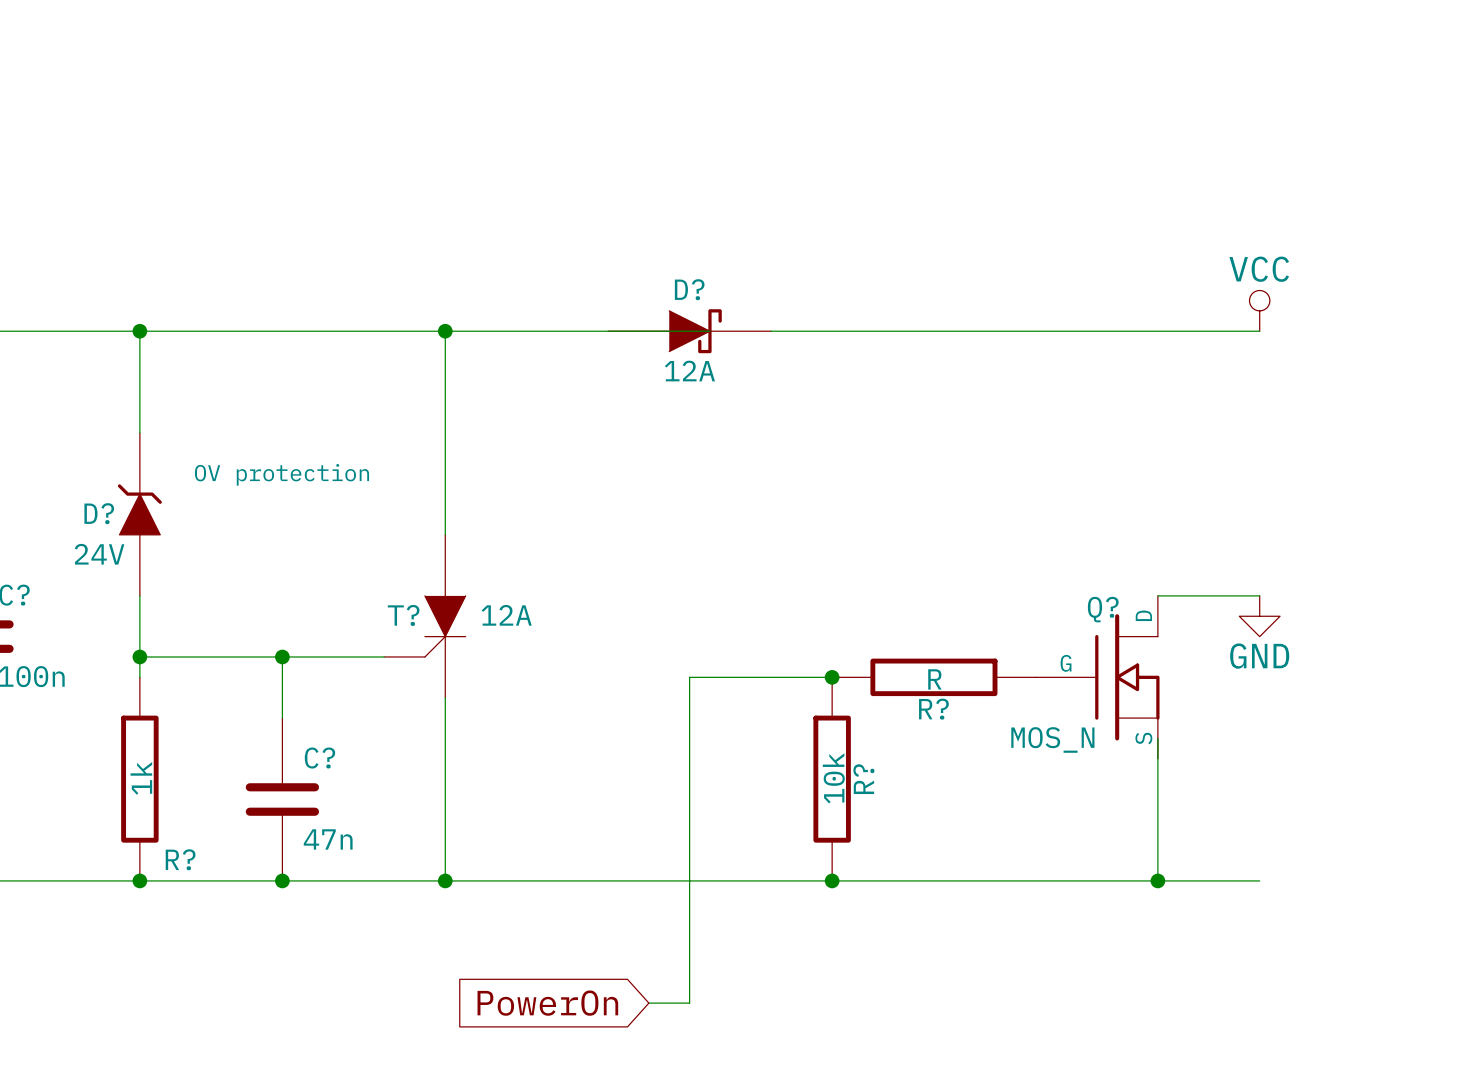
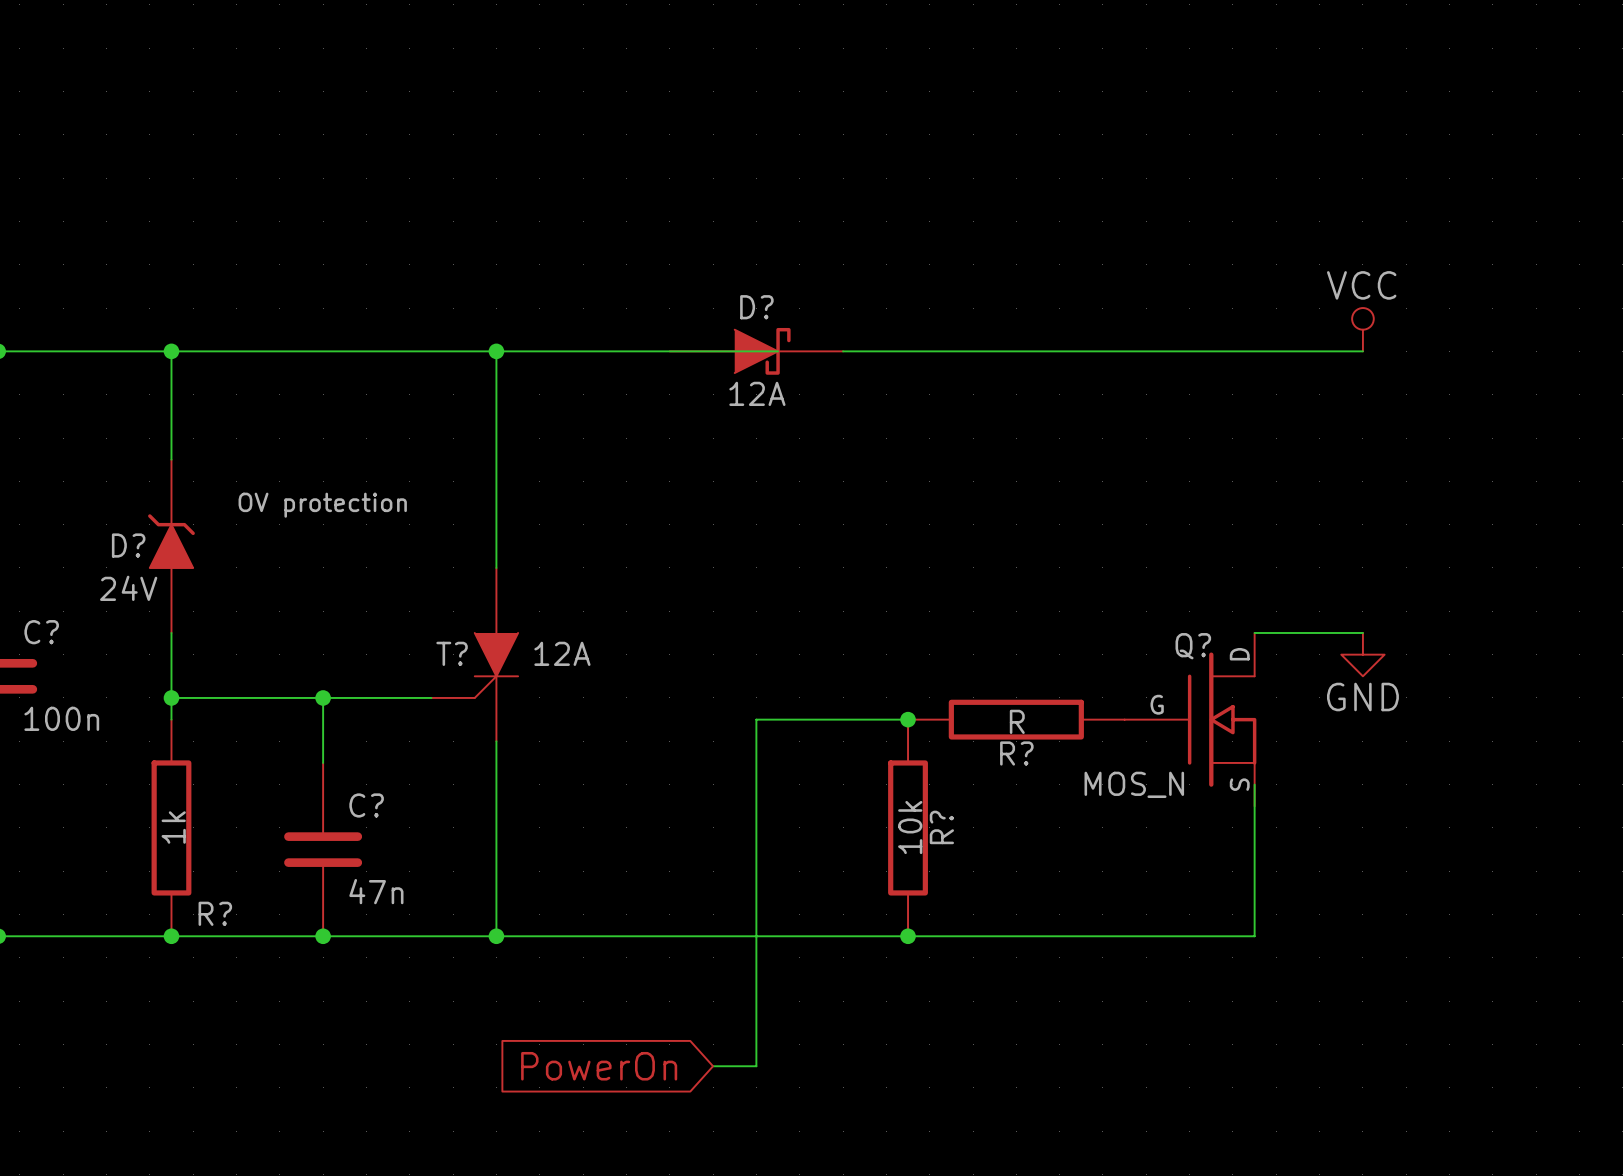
wire: (1157, 880) (1259, 880) -> none
junction: (1157, 880) -> none

